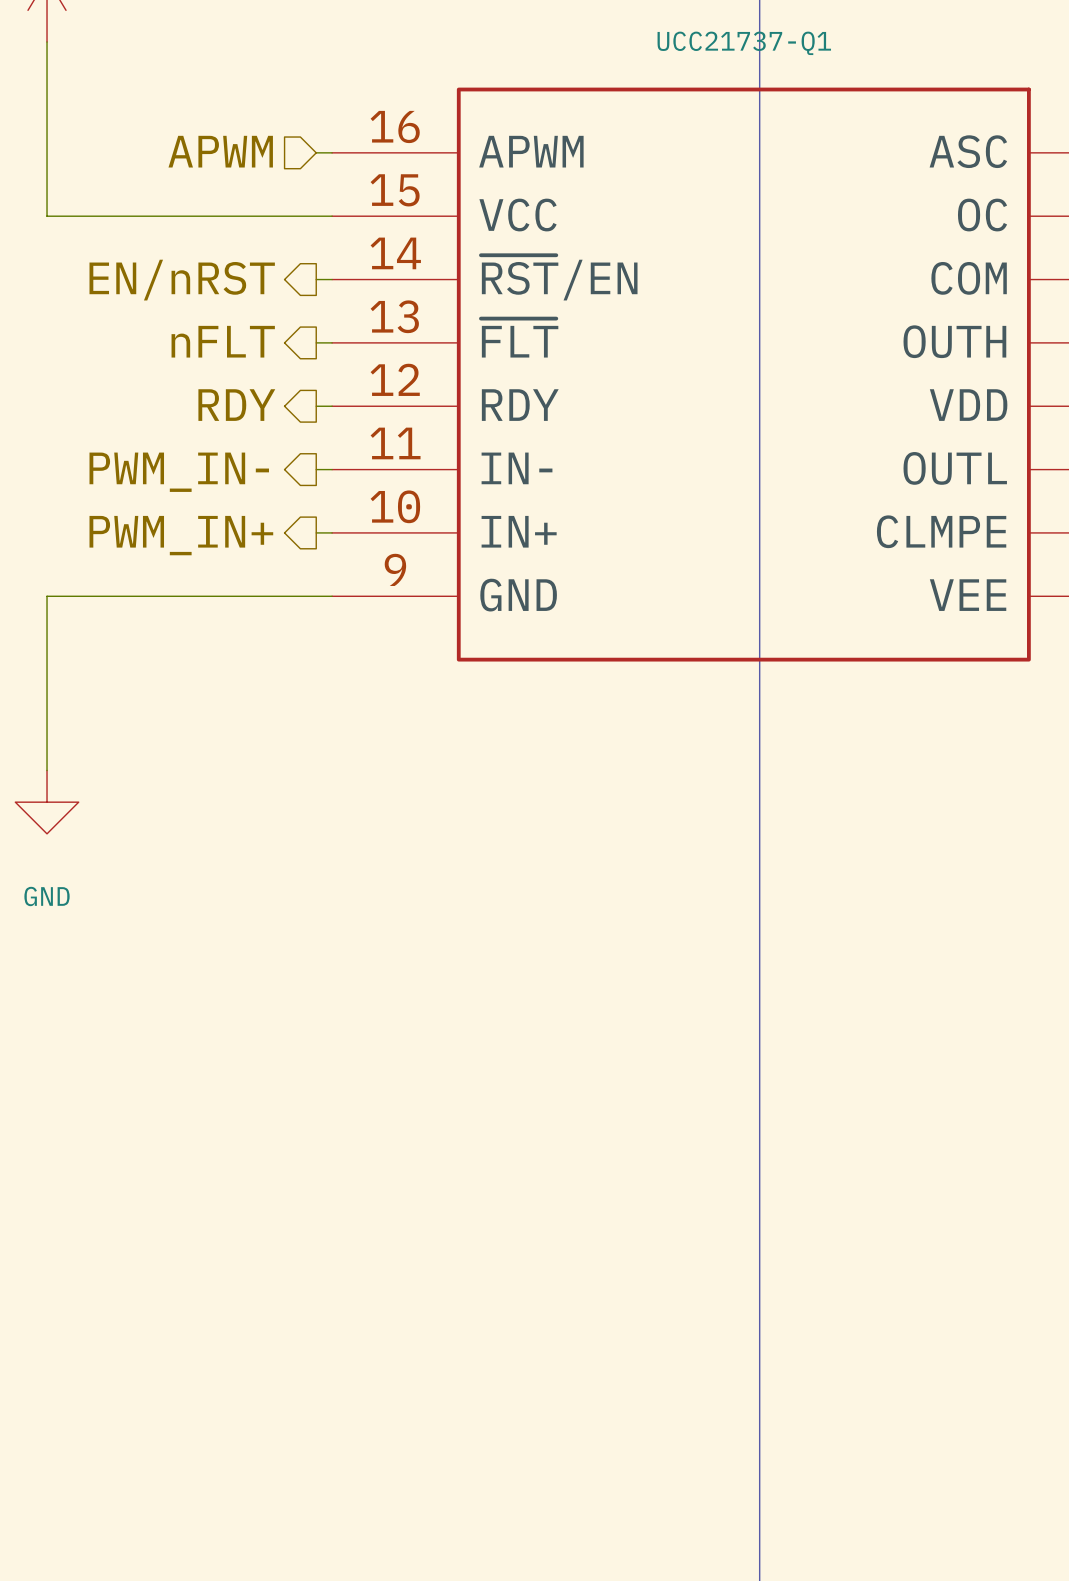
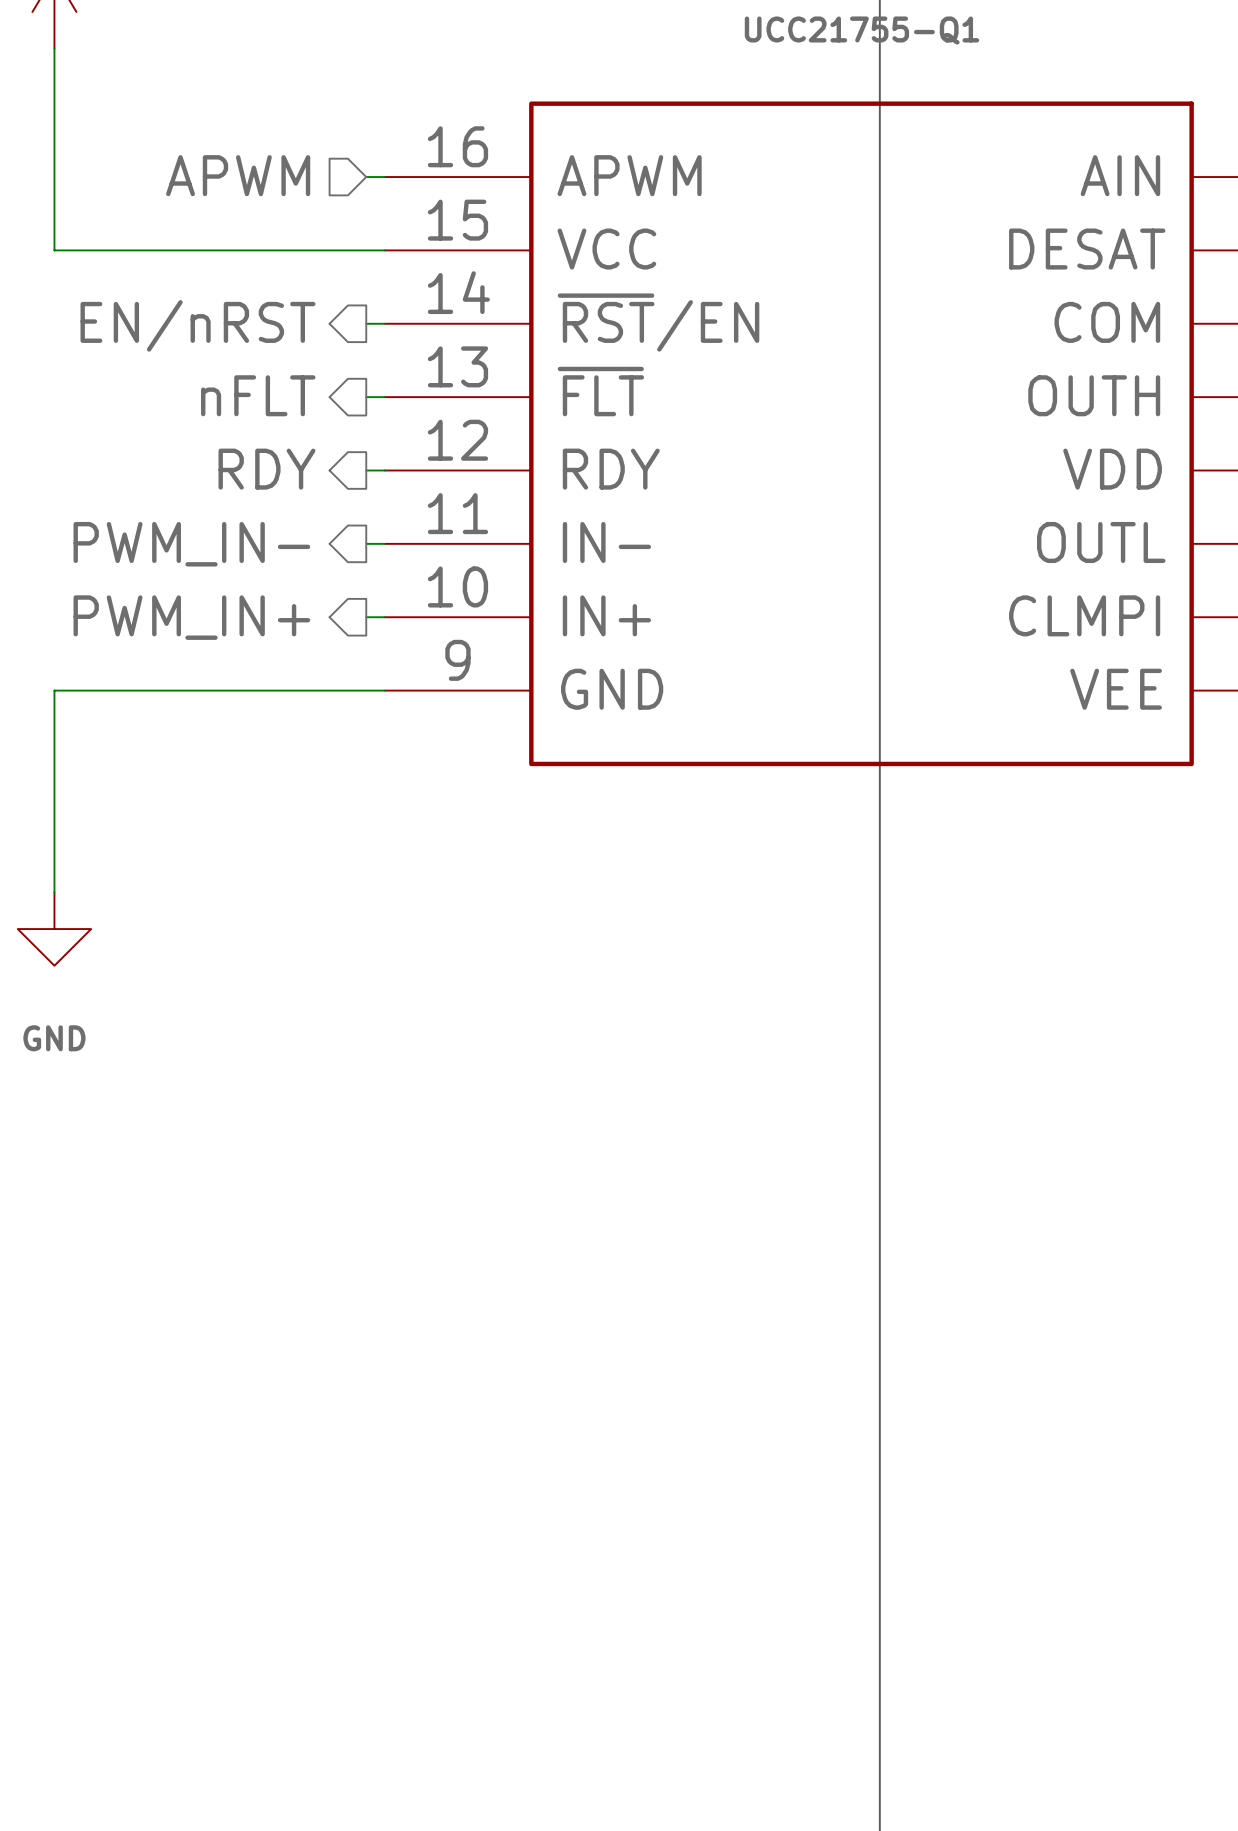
part value: UCC21737-Q1 (744, 43) -> UCC21755-Q1 (862, 30)
part pin name: ASC (968, 151) -> AIN (1120, 175)
part pin name: OC (982, 215) -> DESAT (1087, 249)
part pin name: CLMPE (941, 531) -> CLMPI (1084, 615)

